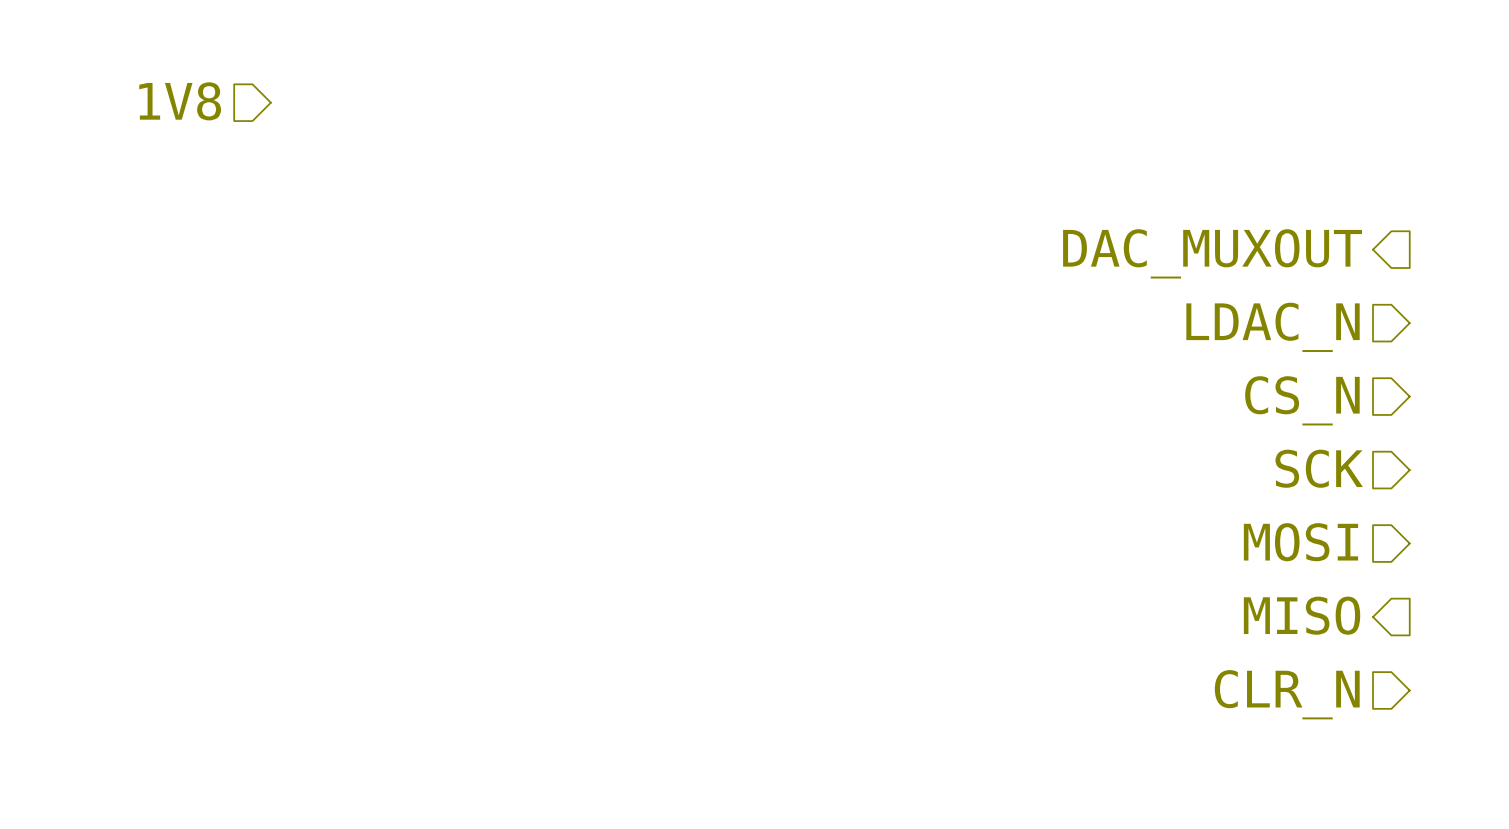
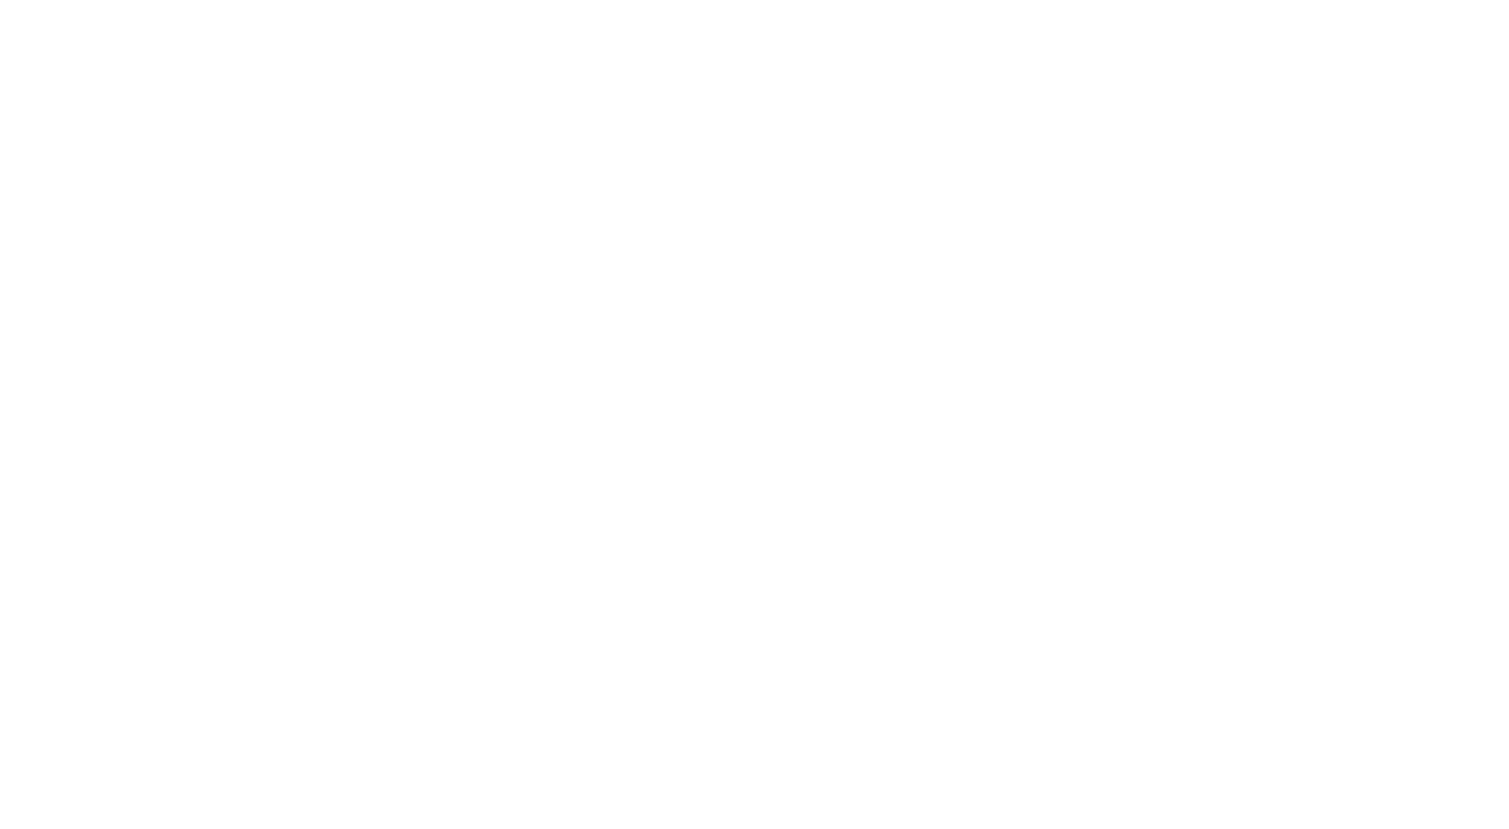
hierarchical label: 1V8 (180, 101) -> none
hierarchical label: DAC_MUXOUT (1212, 253) -> none
hierarchical label: LDAC_N (1273, 327) -> none
hierarchical label: CS_N (1302, 400) -> none
hierarchical label: SCK (1319, 468) -> none
hierarchical label: MOSI (1300, 542) -> none
hierarchical label: MISO (1302, 615) -> none
hierarchical label: CLR_N (1287, 694) -> none

